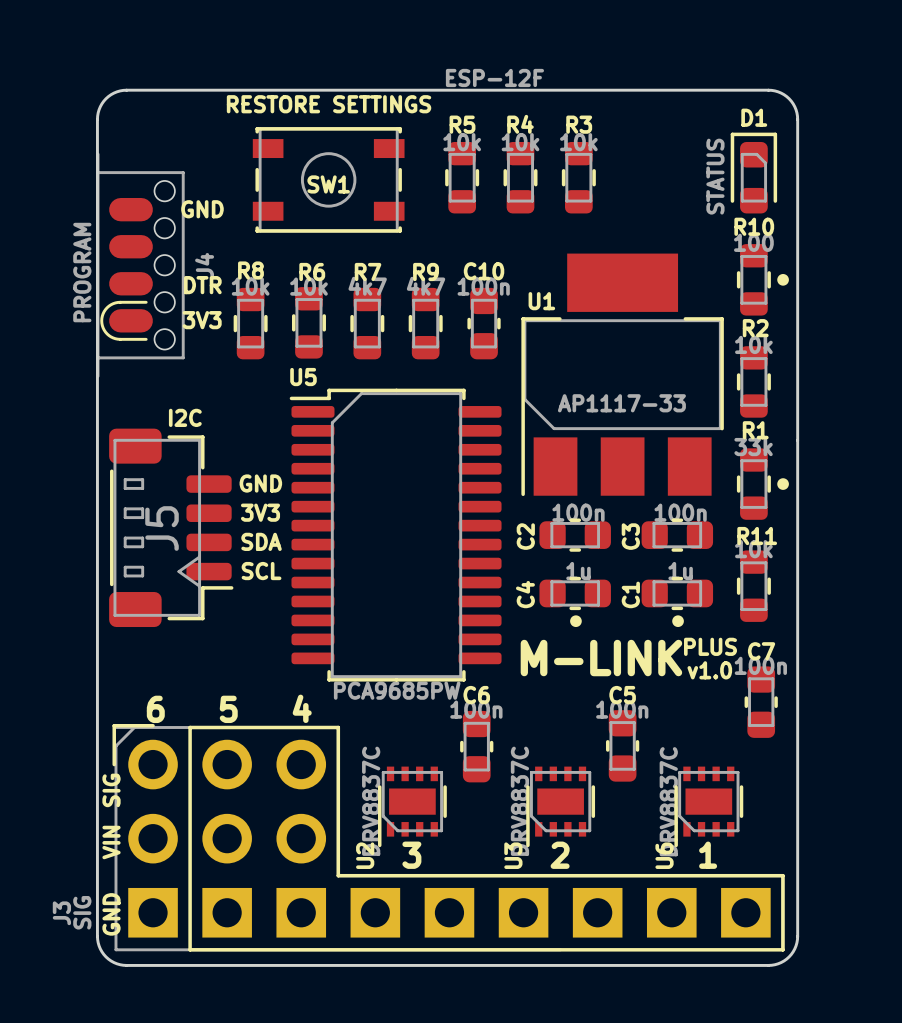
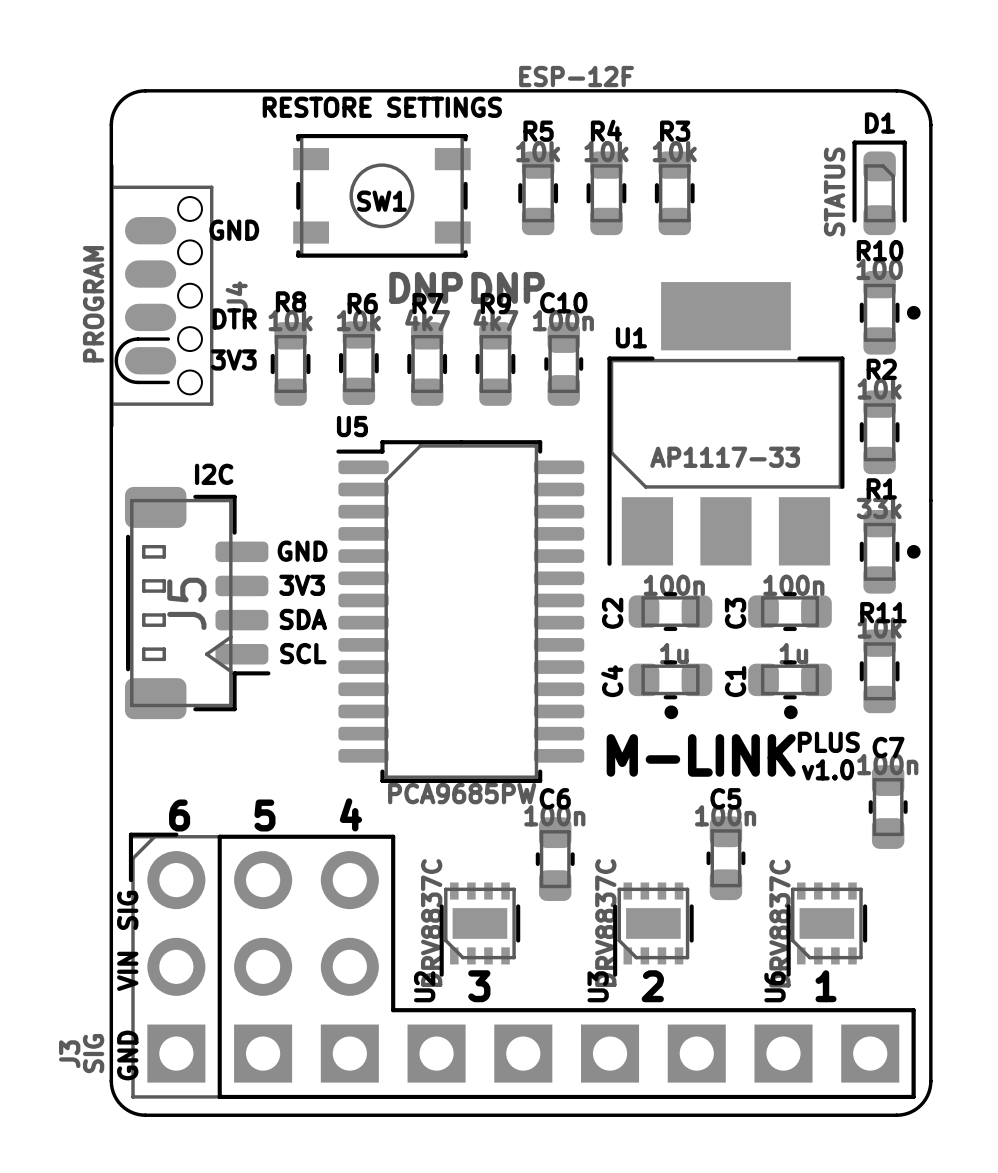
text: none -> DNP (426, 287)
text: none -> DNP (508, 287)

